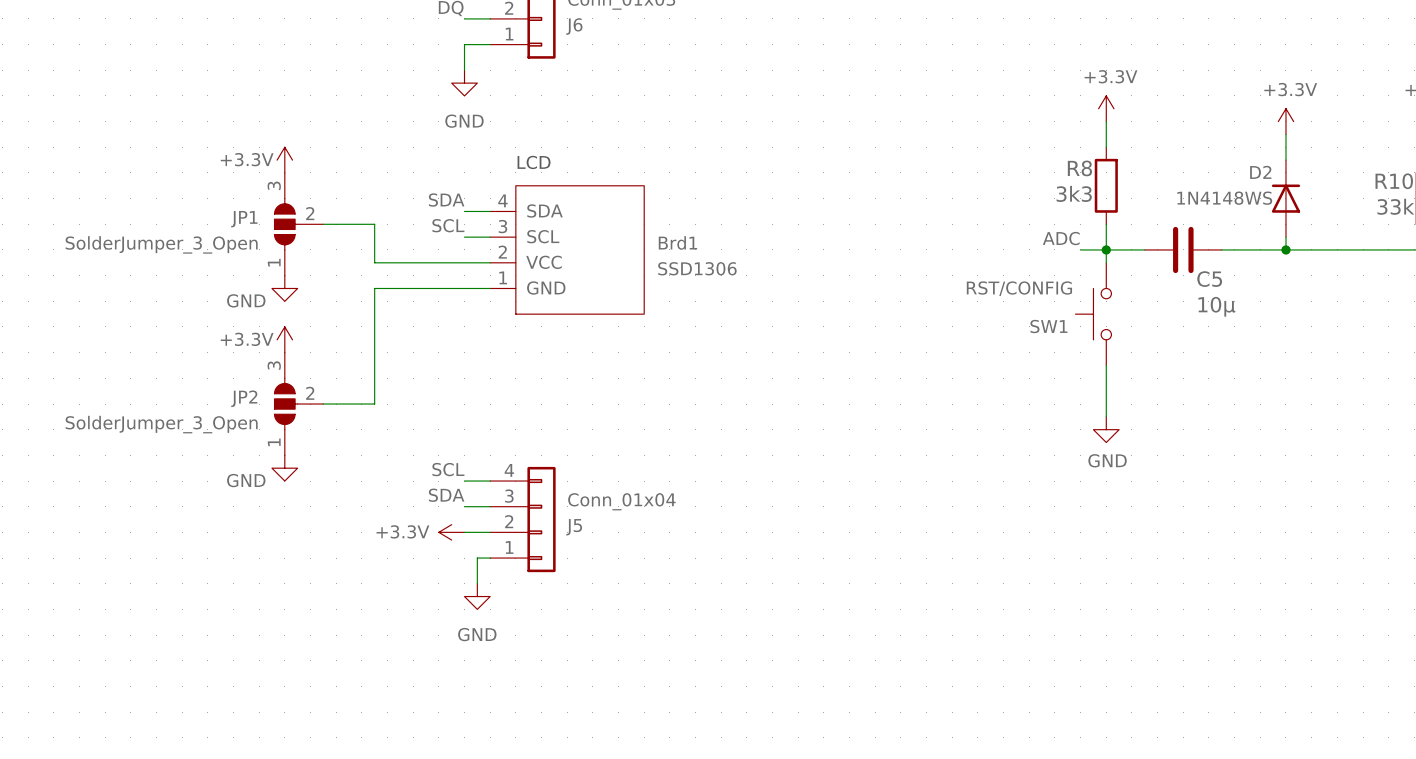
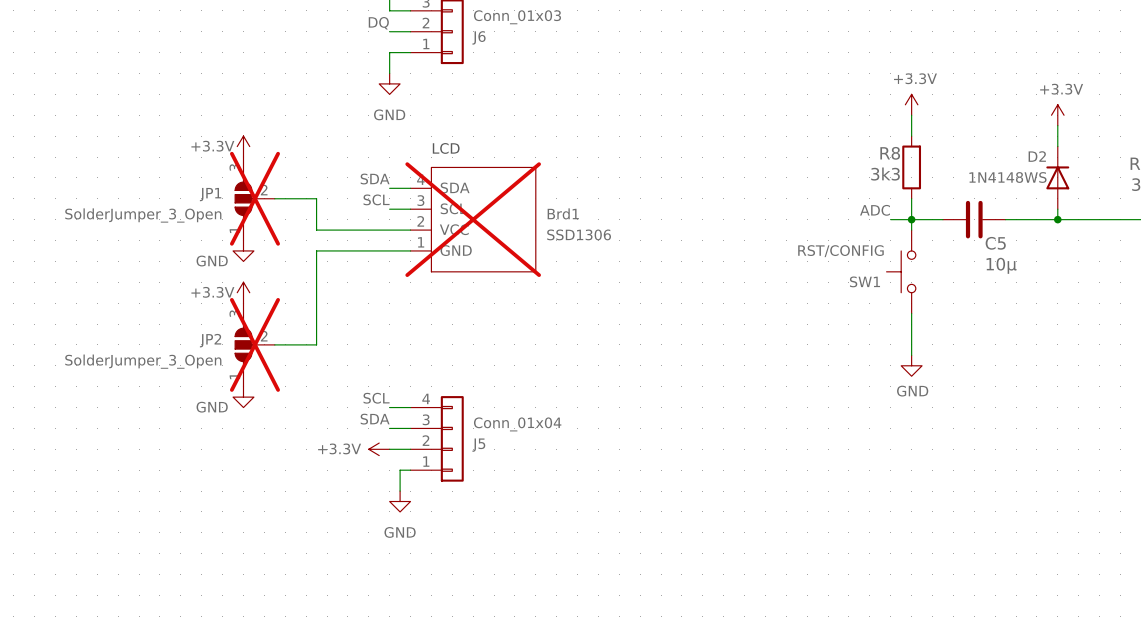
JP1 do-not-place cross: none -> (254, 198)
Brd1 do-not-place cross: none -> (473, 219)
JP2 do-not-place cross: none -> (254, 344)

